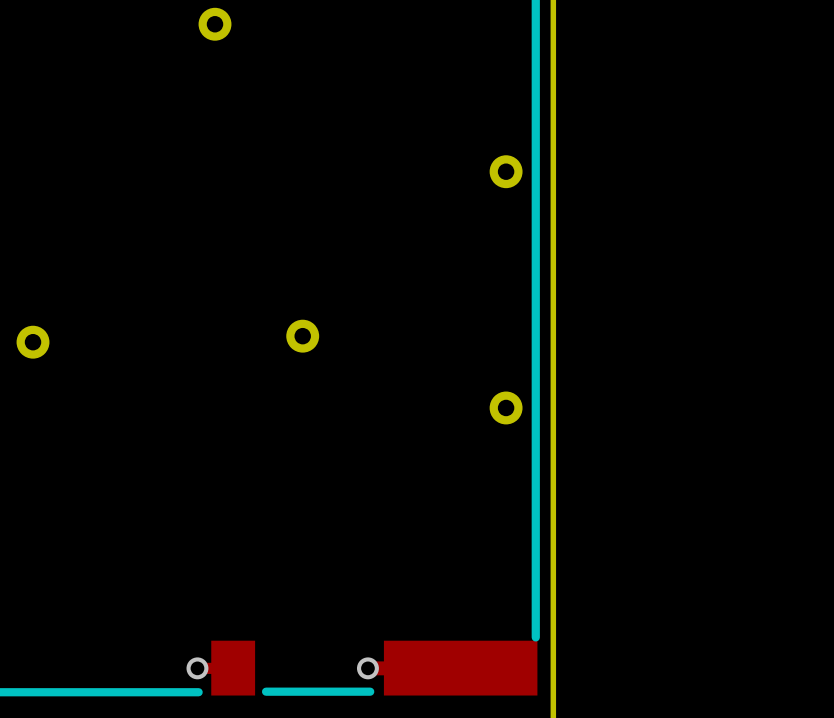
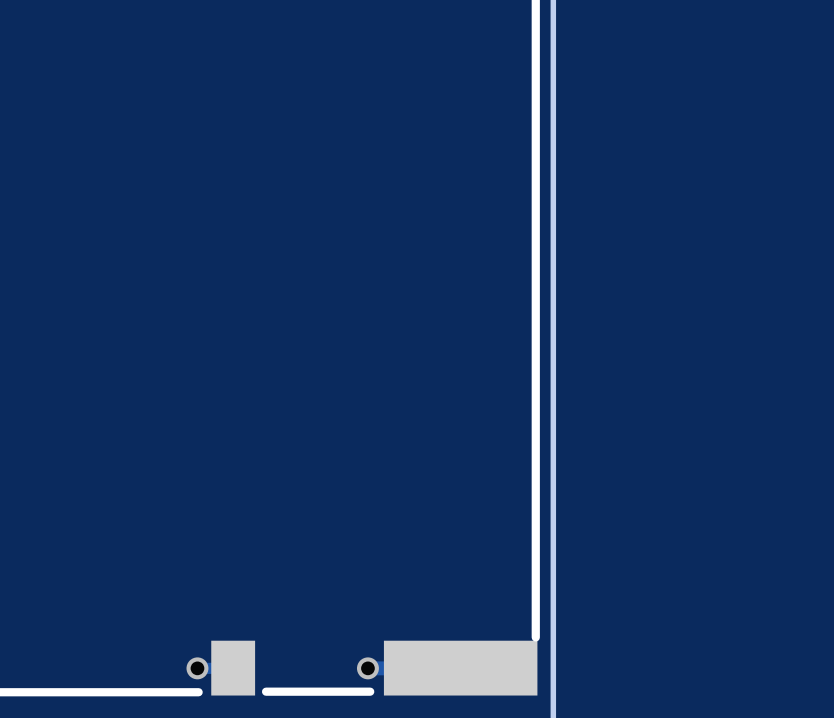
part: (215, 24) -> none
part: (506, 171) -> none
part: (302, 336) -> none
part: (33, 342) -> none
part: (506, 407) -> none

